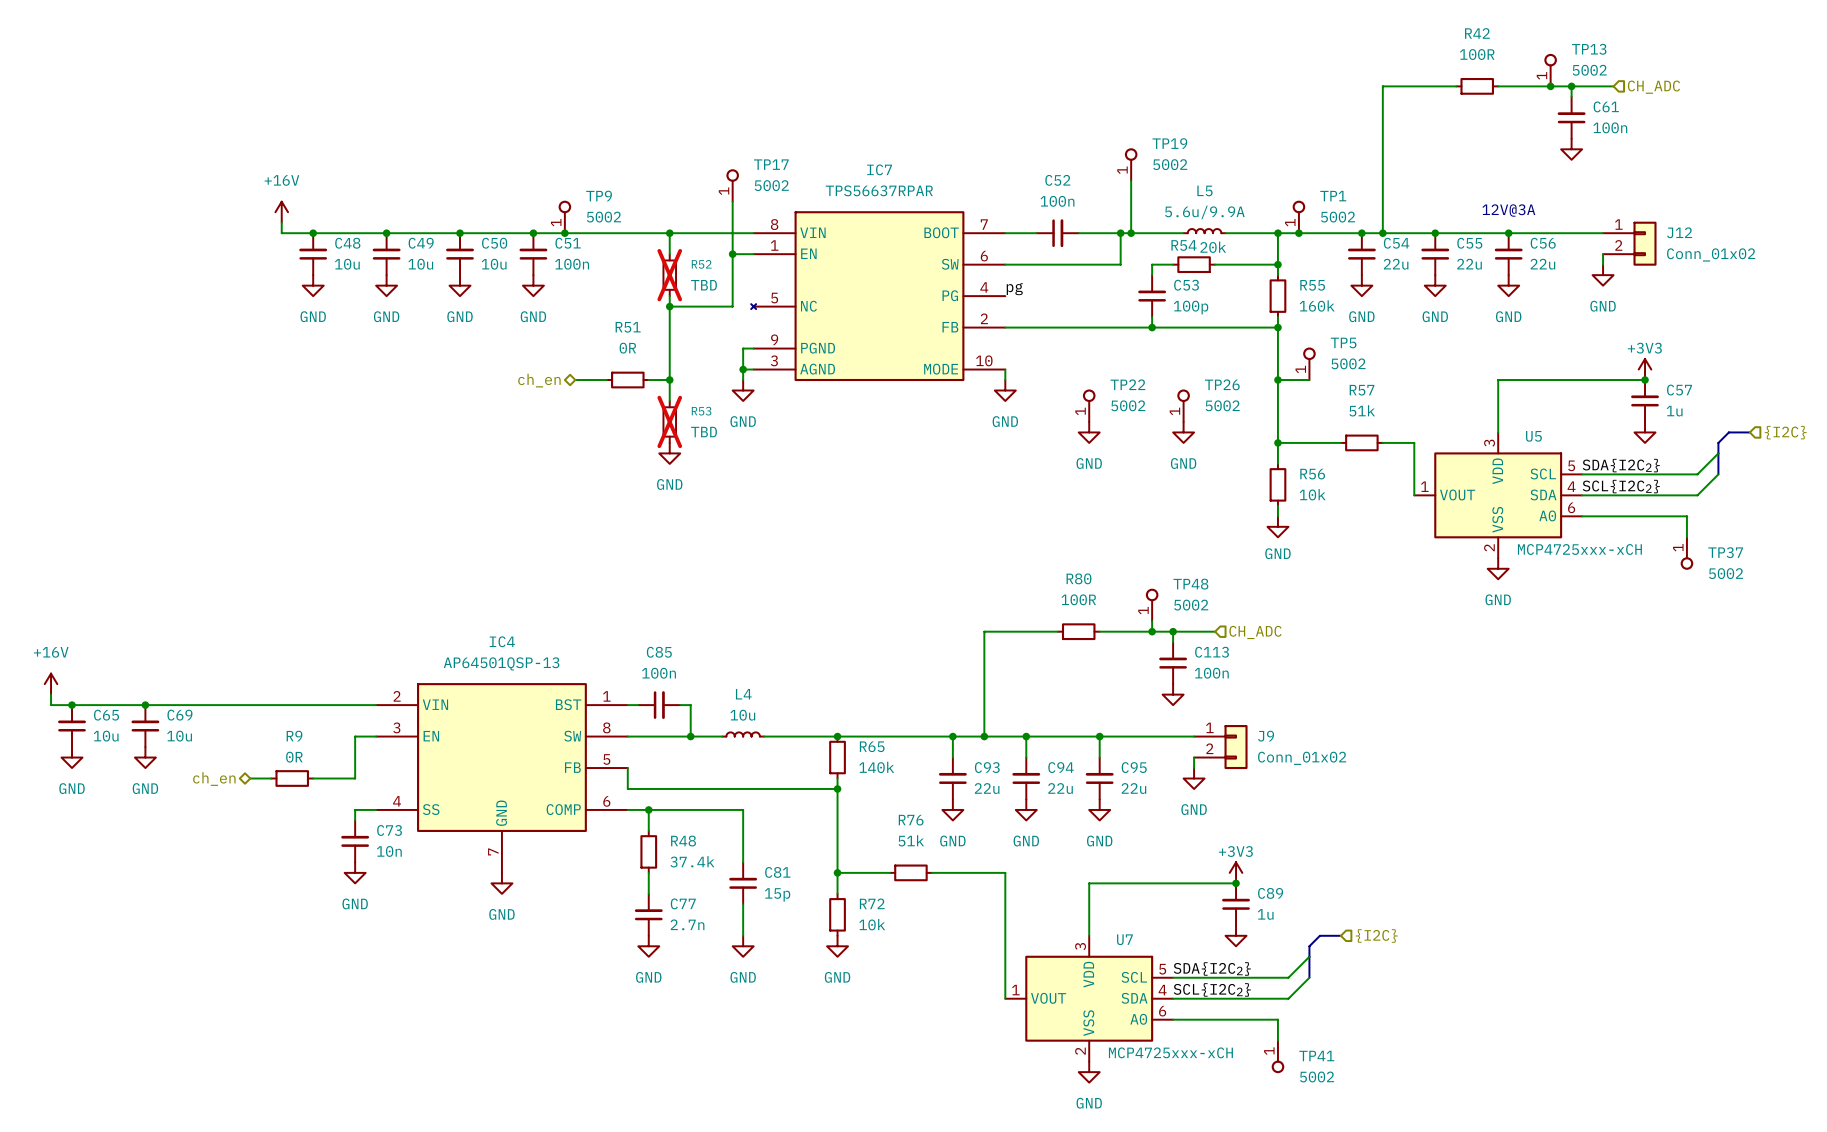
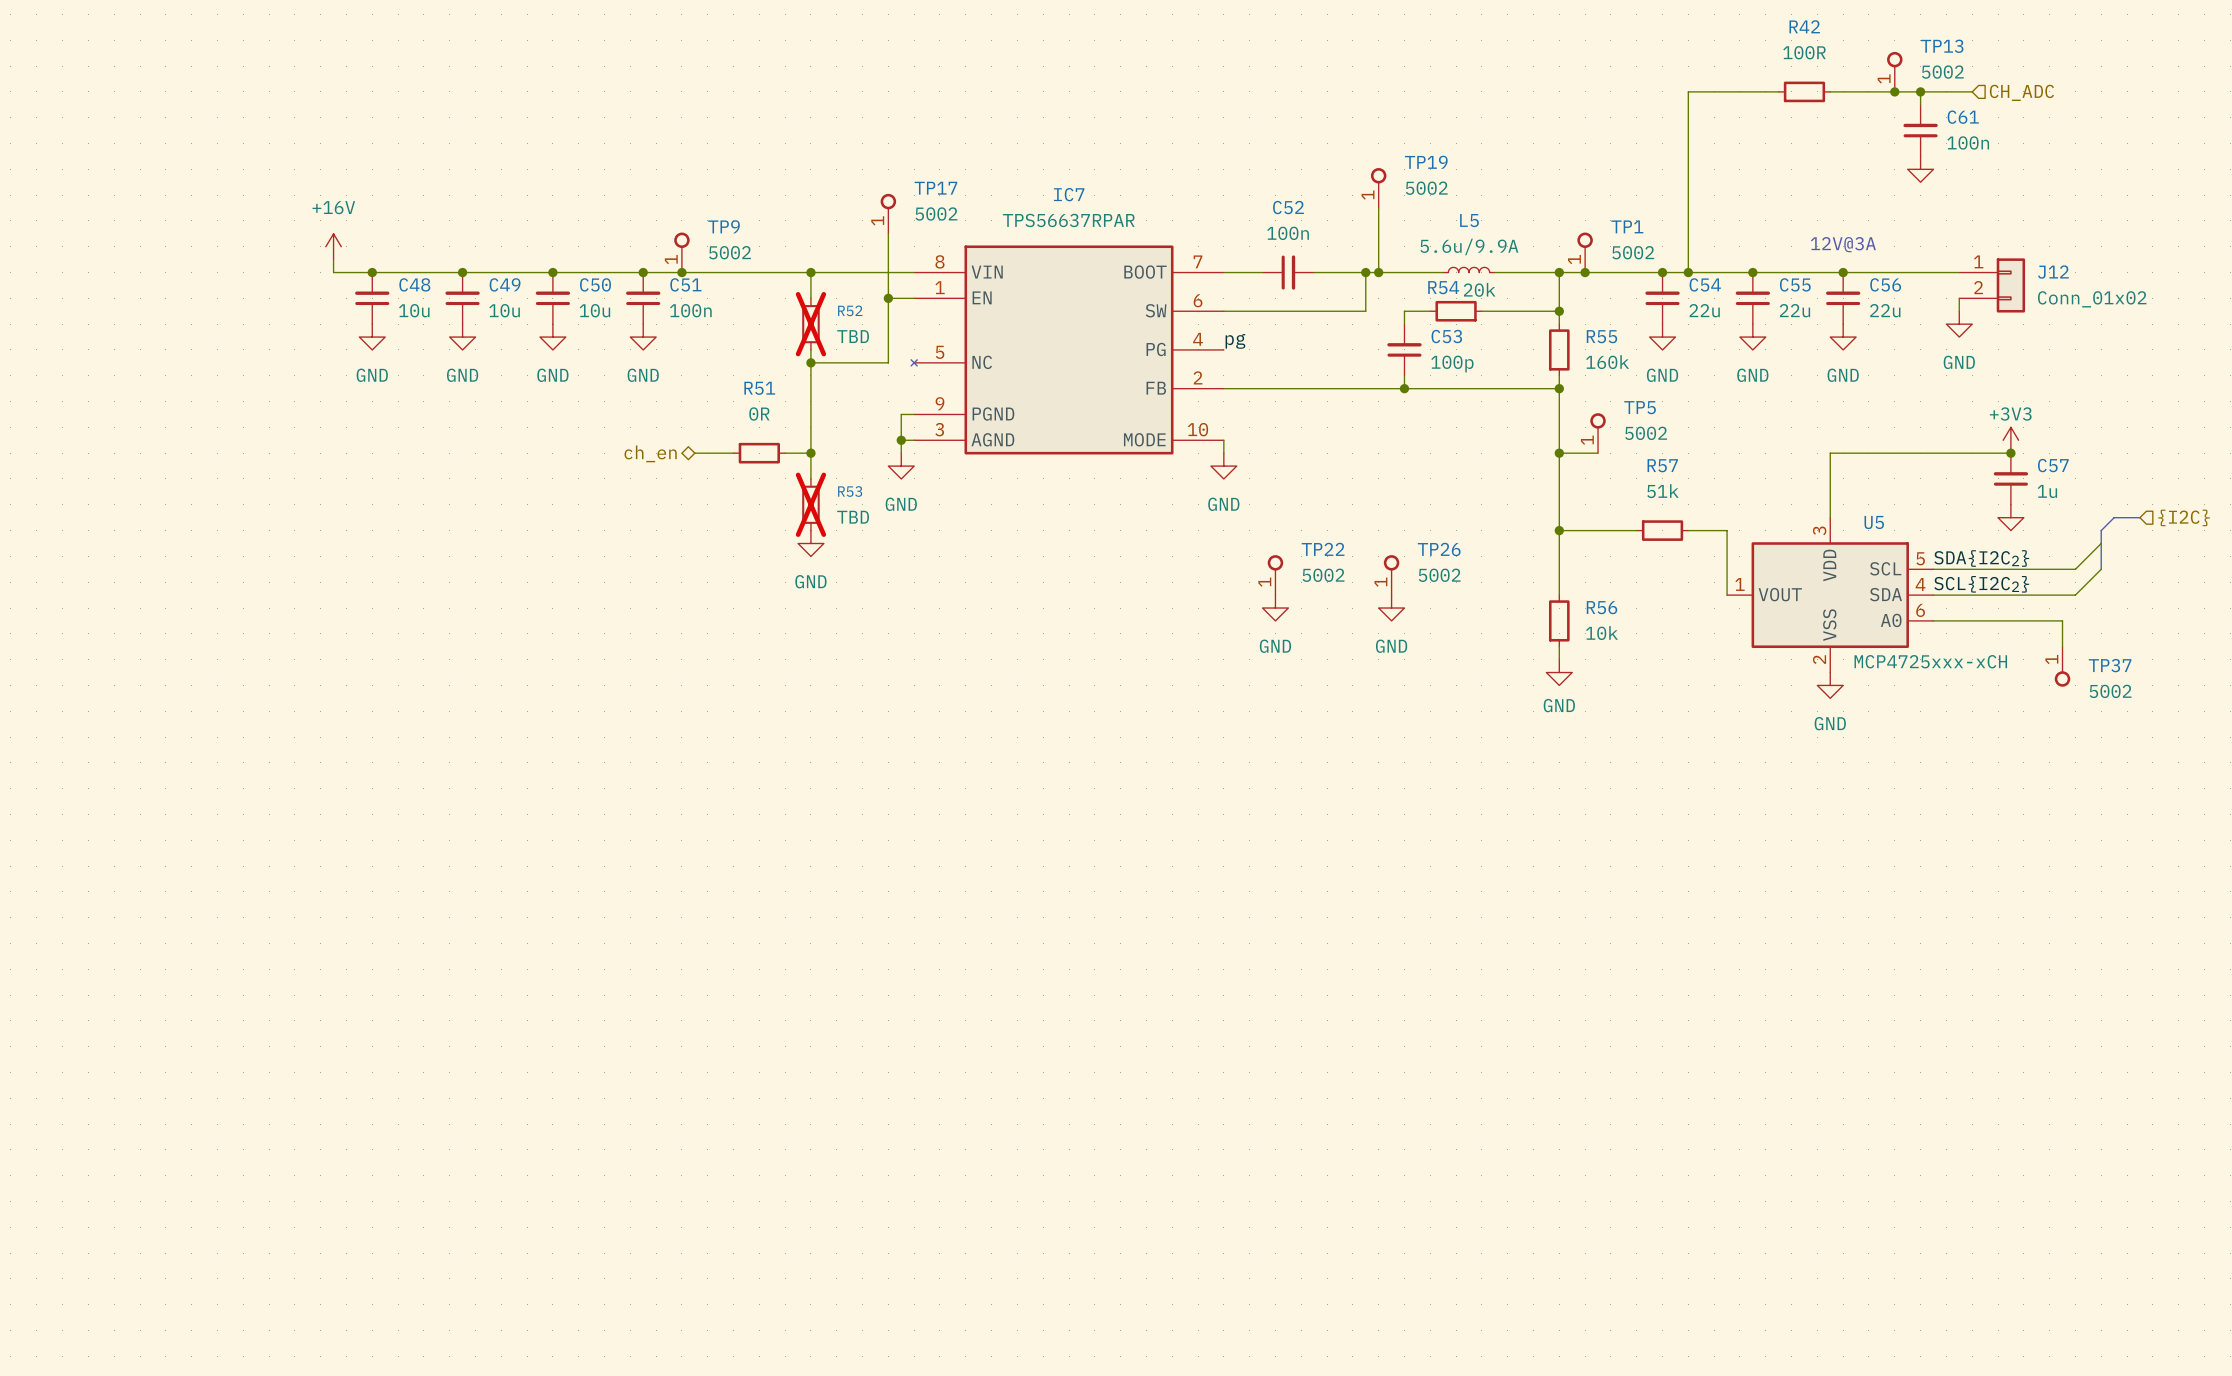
TP22 position: (1089, 405) -> (1275, 575)
TP26 position: (1183, 405) -> (1391, 575)
power symbol: GND (1089, 432) -> none
power symbol: GND (1183, 432) -> none
wire: none -> (1559, 556) (1559, 595)
R56 position: (1277, 484) -> (1559, 620)
power symbol: none -> GND (1275, 608)
power symbol: none -> GND (1391, 608)
wire: (1277, 505) (1277, 516) -> (1559, 646) (1559, 659)
power symbol position: GND (1277, 526) -> GND (1559, 672)
TP48: (1152, 604) -> none
wire: (1152, 621) (1152, 631) -> none
wire: (1057, 631) (984, 631) (984, 736) -> none
R80: (1078, 631) -> none
wire: (1099, 631) (1215, 631) -> none
junction: (1152, 631) -> none
wire: (1173, 631) (1173, 642) -> none
junction: (1173, 631) -> none
hierarchical label: CH_ADC (1255, 632) -> none
C113: (1173, 663) -> none
power symbol: +16V (51, 684) -> none
wire: (51, 694) (51, 705) (376, 705) -> none
power symbol: (1173, 694) -> none
junction: (72, 705) -> none
junction: (145, 705) -> none
wire: (627, 705) (638, 705) -> none
C85: (659, 705) -> none
wire: (680, 705) (690, 705) (690, 736) -> none
C65: (72, 726) -> none
C69: (145, 726) -> none
L4: (743, 734) -> none
wire: (376, 736) (355, 736) (355, 778) (313, 778) -> none
wire: (627, 736) (722, 736) -> none
junction: (690, 736) -> none
wire: (764, 736) (1194, 736) -> none
junction: (837, 736) -> none
wire: (952, 736) (952, 757) -> none
junction: (952, 736) -> none
junction: (984, 736) -> none
wire: (1026, 736) (1026, 757) -> none
junction: (1026, 736) -> none
wire: (1099, 736) (1099, 757) -> none
junction: (1099, 736) -> none
J9: Conn_01x02 (1220, 747) -> none
power symbol: GND (72, 757) -> none
power symbol: GND (145, 757) -> none
R65: (837, 757) -> none
wire: (1194, 757) (1194, 768) -> none
wire: (627, 768) (627, 788) (837, 788) -> none
IC4: AP64501QSP-13 (501, 777) -> none
wire: (250, 778) (271, 778) -> none
R9: (292, 778) -> none
wire: (837, 778) (837, 893) -> none
C93: (952, 778) -> none
C94: (1026, 778) -> none
C95: (1099, 778) -> none
power symbol: GND (1194, 778) -> none
hierarchical label: ch_en (214, 779) -> none
junction: (837, 788) -> none
wire: (376, 809) (355, 809) (355, 820) -> none
wire: (627, 809) (743, 809) (743, 862) -> none
wire: (648, 809) (648, 830) -> none
junction: (648, 809) -> none
power symbol: GND (952, 809) -> none
power symbol: GND (1026, 809) -> none
power symbol: GND (1099, 809) -> none
C73: (355, 841) -> none
R48: (648, 851) -> none
power symbol: GND (355, 872) -> none
wire: (648, 872) (648, 893) -> none
wire: (837, 872) (889, 872) -> none
junction: (837, 872) -> none
R76: (910, 872) -> none
wire: (931, 872) (1005, 872) (1005, 998) -> none
power symbol: +3V3 (1236, 872) -> none
power symbol: GND (501, 883) -> none
C81: (743, 883) -> none
wire: (1236, 883) (1089, 883) (1089, 935) -> none
junction: (1236, 883) -> none
wire: (743, 904) (743, 935) -> none
C89: (1236, 904) -> none
C77: (648, 914) -> none
R72: (837, 914) -> none
power symbol: (1236, 935) -> none
bus: (1340, 935) (1319, 935) (1309, 946) (1309, 977) -> none
hierarchical label: {I2C} (1376, 935) -> none
power symbol: GND (648, 946) -> none
power symbol: GND (743, 946) -> none
power symbol: GND (837, 946) -> none
wire: (1309, 956) (1288, 977) (1173, 977) -> none
label: SDA{I2C2} (1212, 968) -> none
wire: (1309, 977) (1288, 998) (1173, 998) -> none
label: SCL{I2C2} (1212, 989) -> none
U7: MCP4725xxx-xCH (1089, 998) -> none
wire: (1173, 1019) (1277, 1019) (1277, 1040) -> none
TP41: (1277, 1056) -> none
power symbol: GND (1089, 1072) -> none

